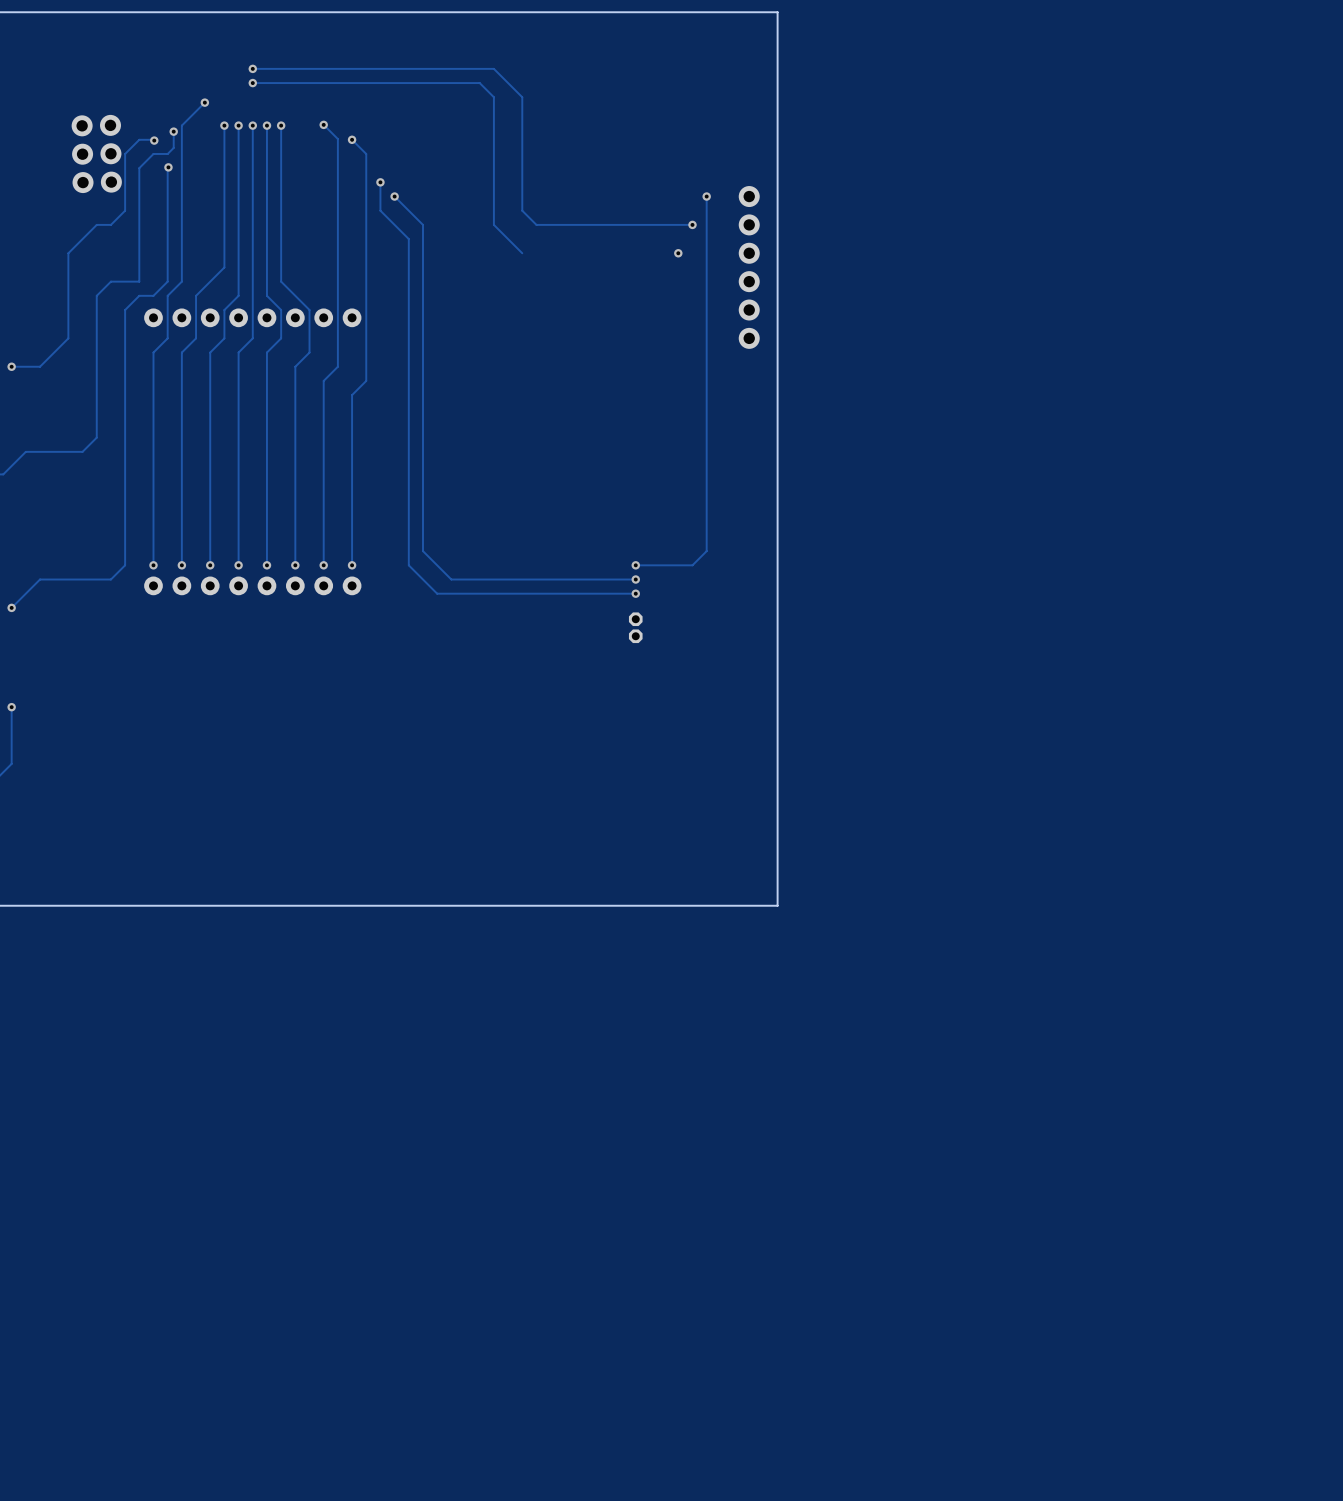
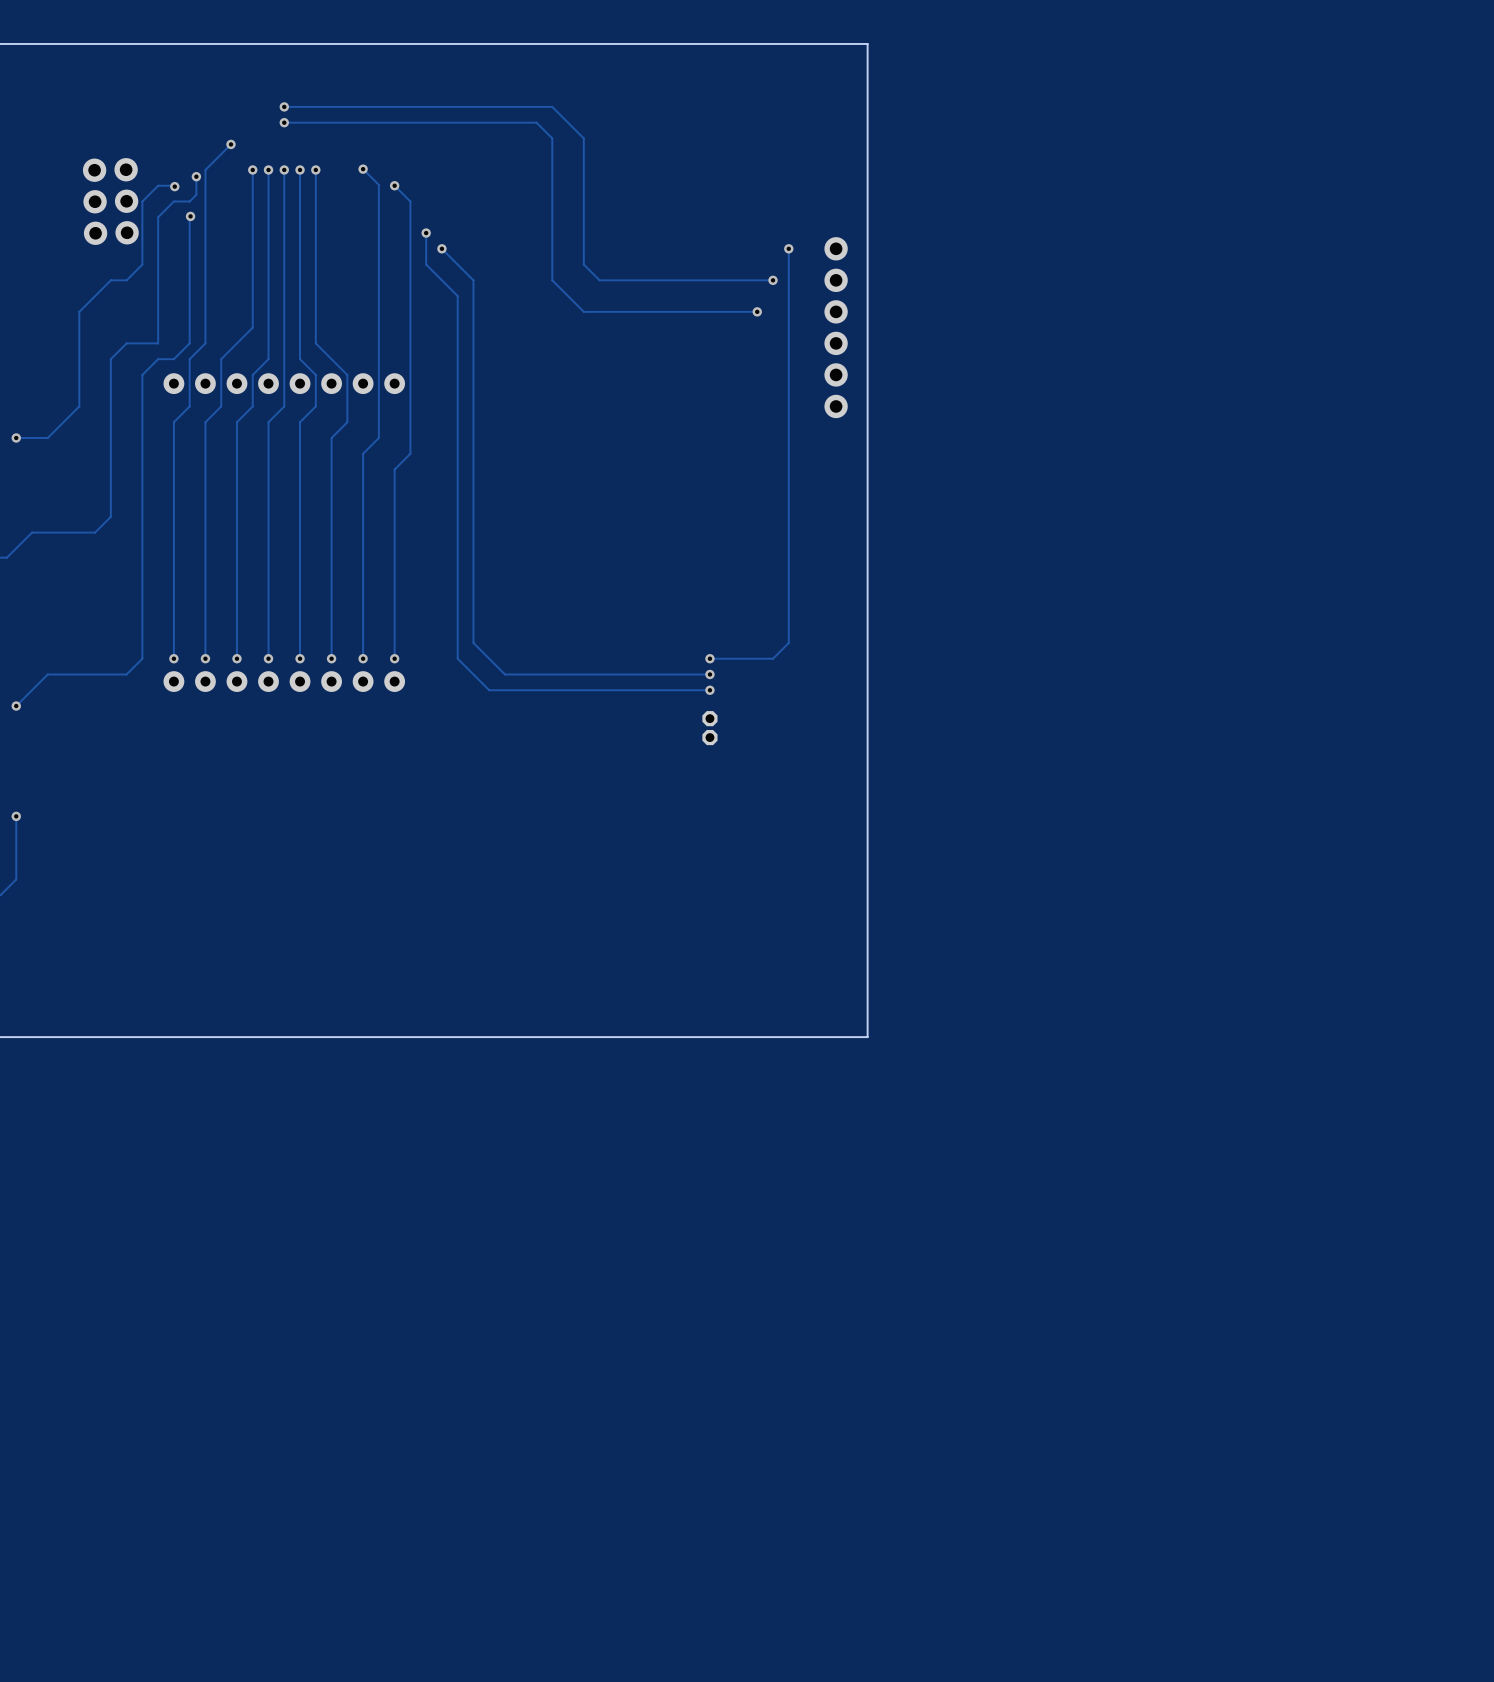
track: none -> (757, 311) (583, 311)

